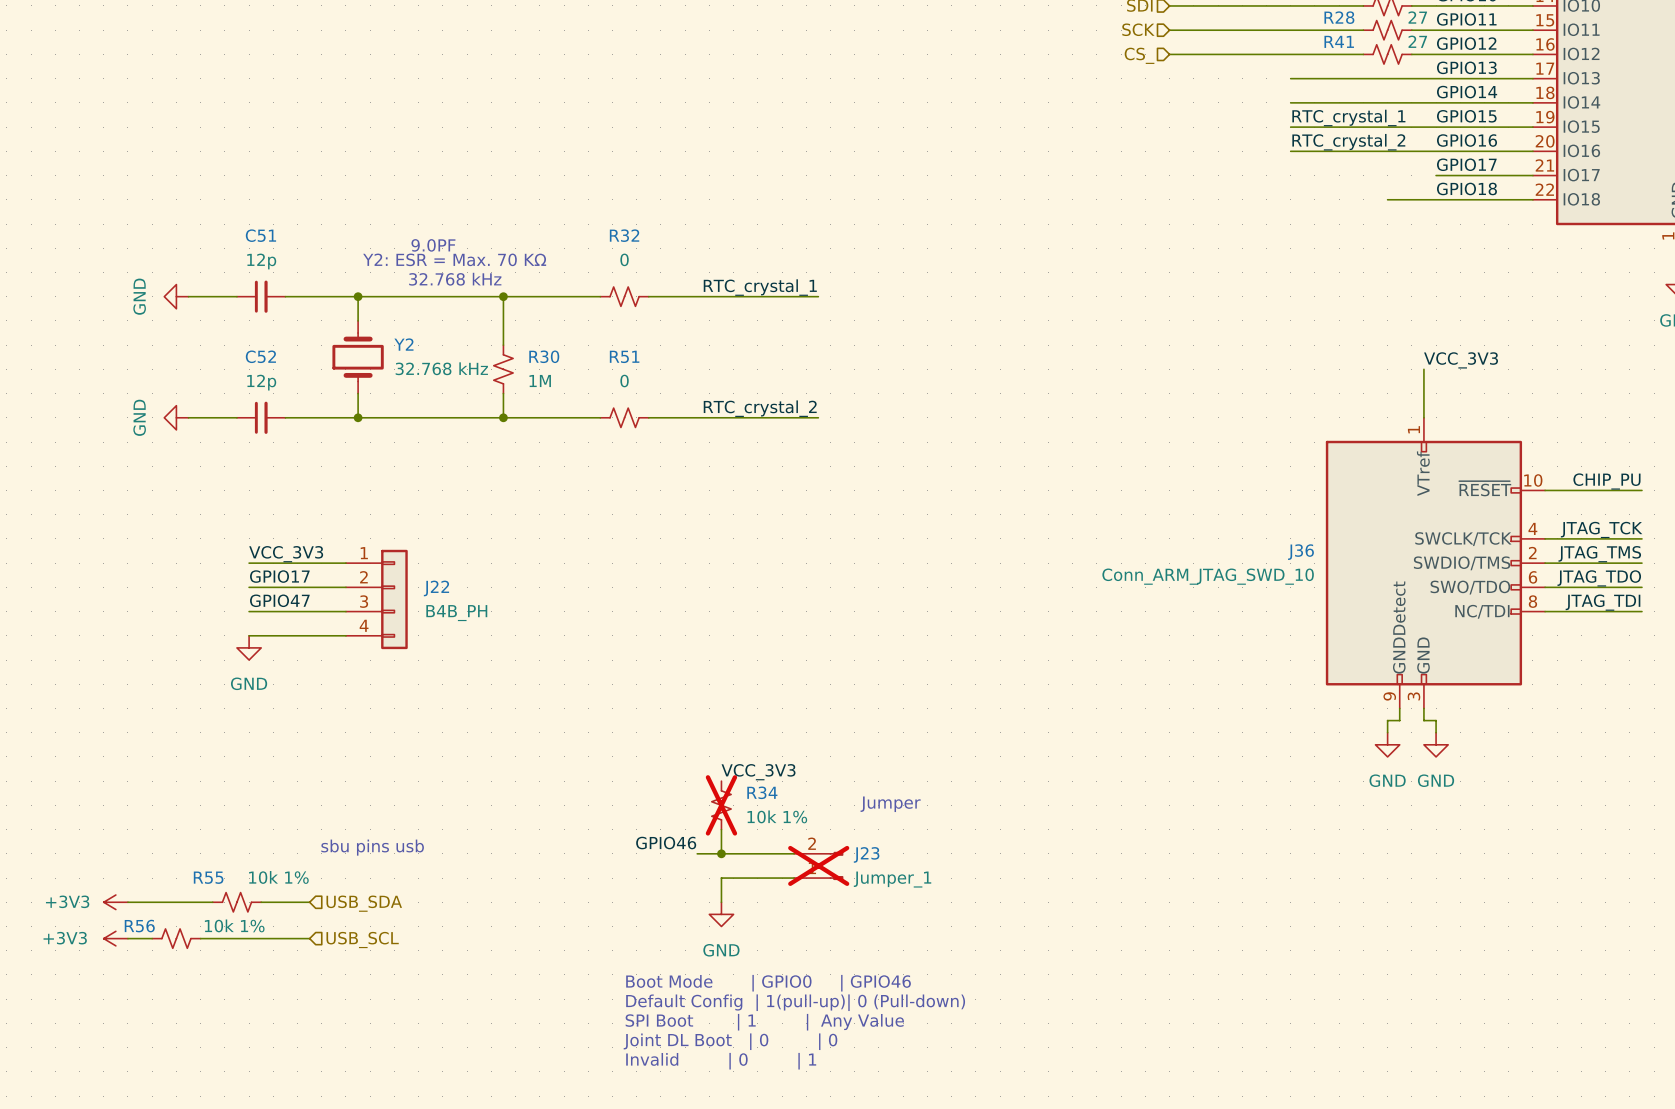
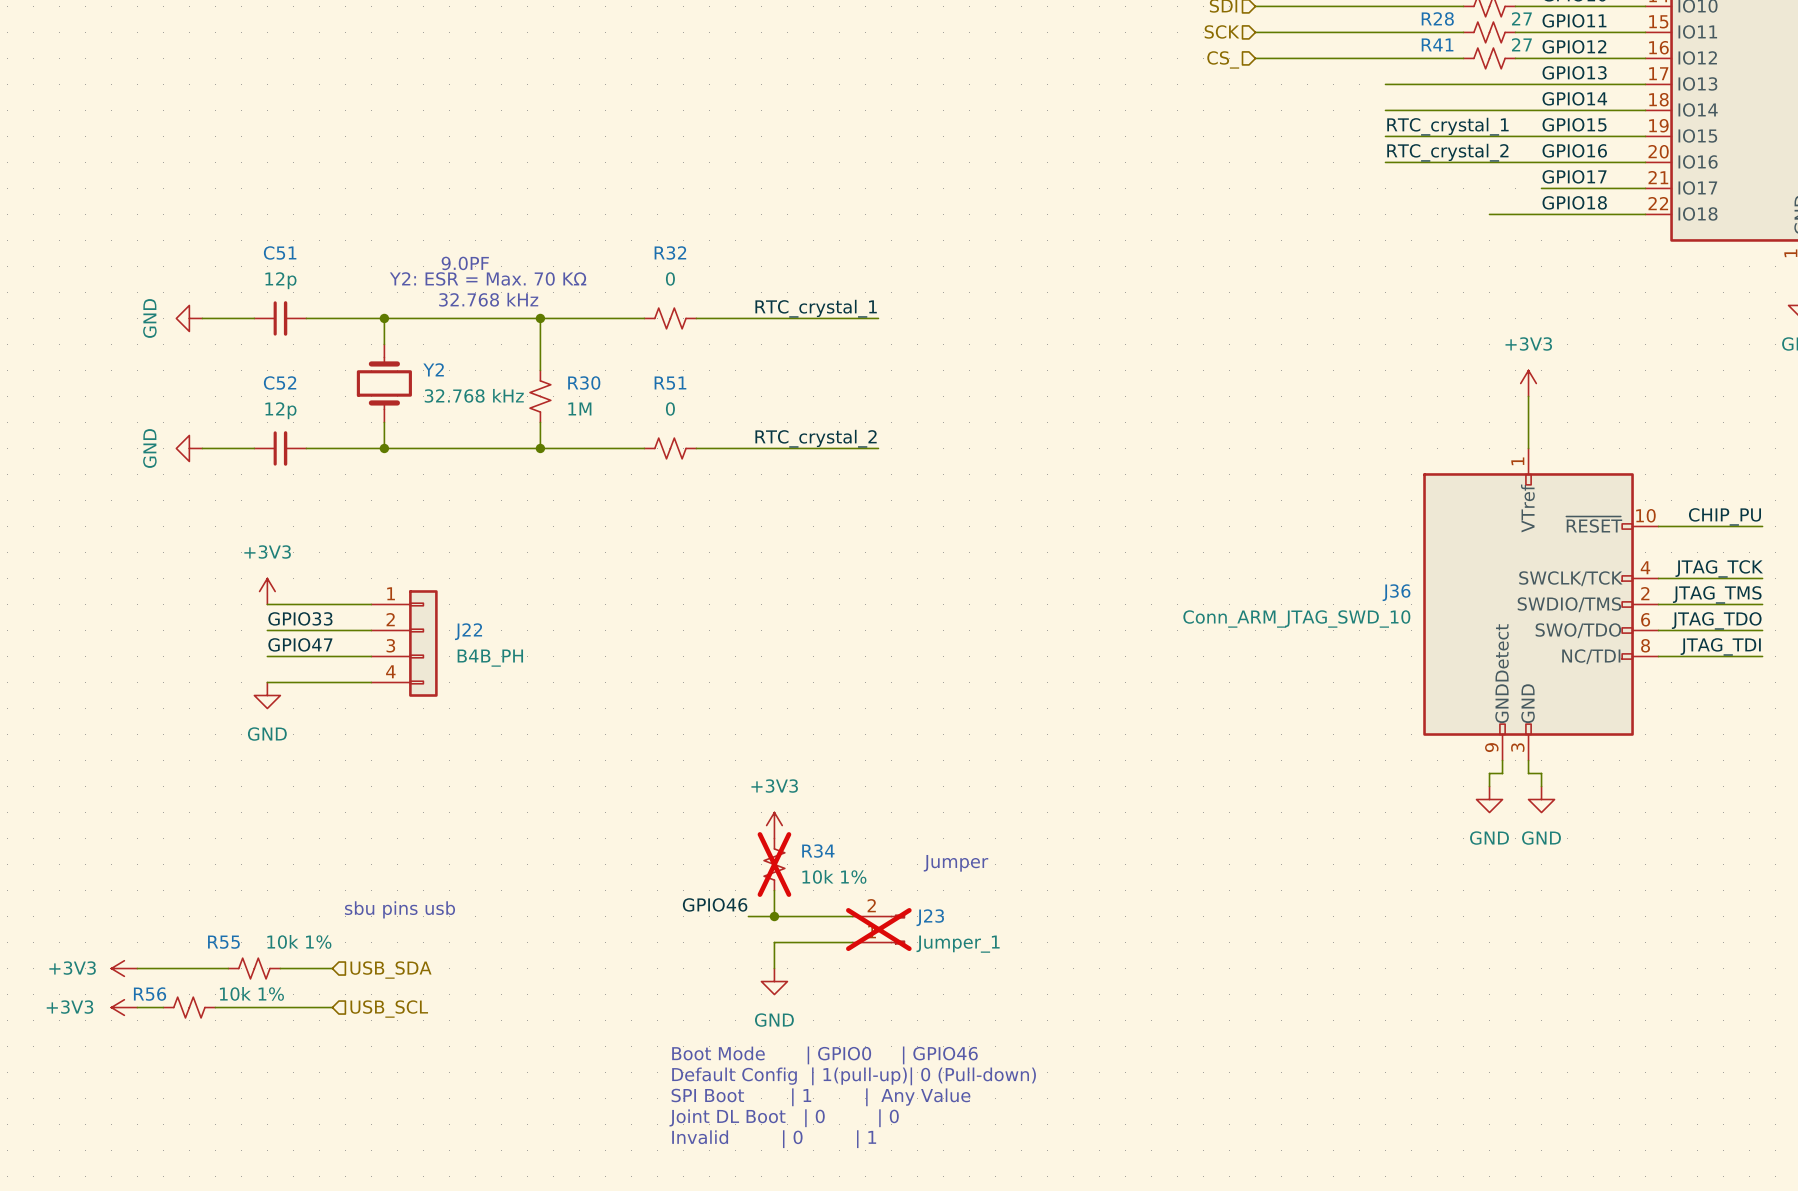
power symbol: none -> +3V3 (1528, 383)
label: VCC_3V3 (1461, 360) -> none
power symbol: none -> +3V3 (267, 591)
label: VCC_3V3 (286, 554) -> none
label: GPIO17 (279, 576) -> GPIO33 (300, 618)
power symbol: none -> +3V3 (774, 825)
label: VCC_3V3 (758, 772) -> none

